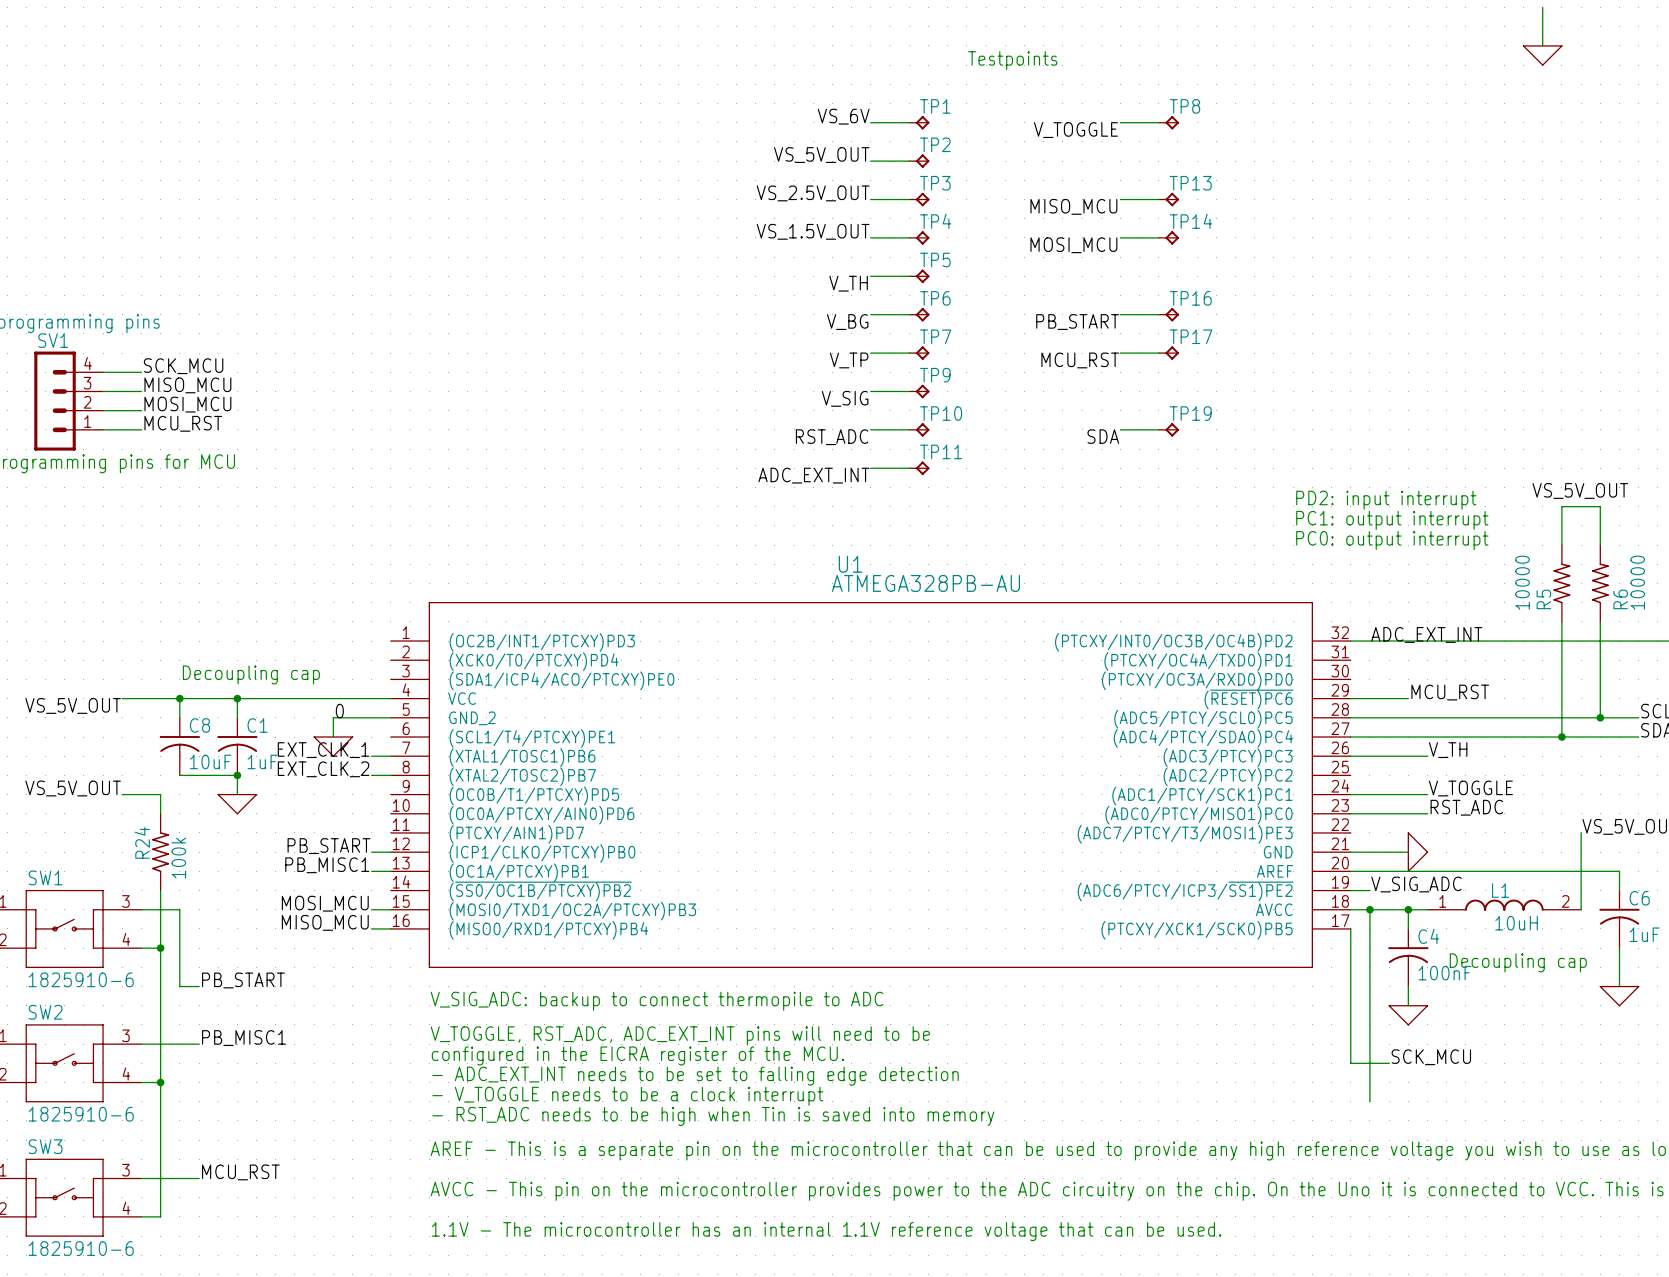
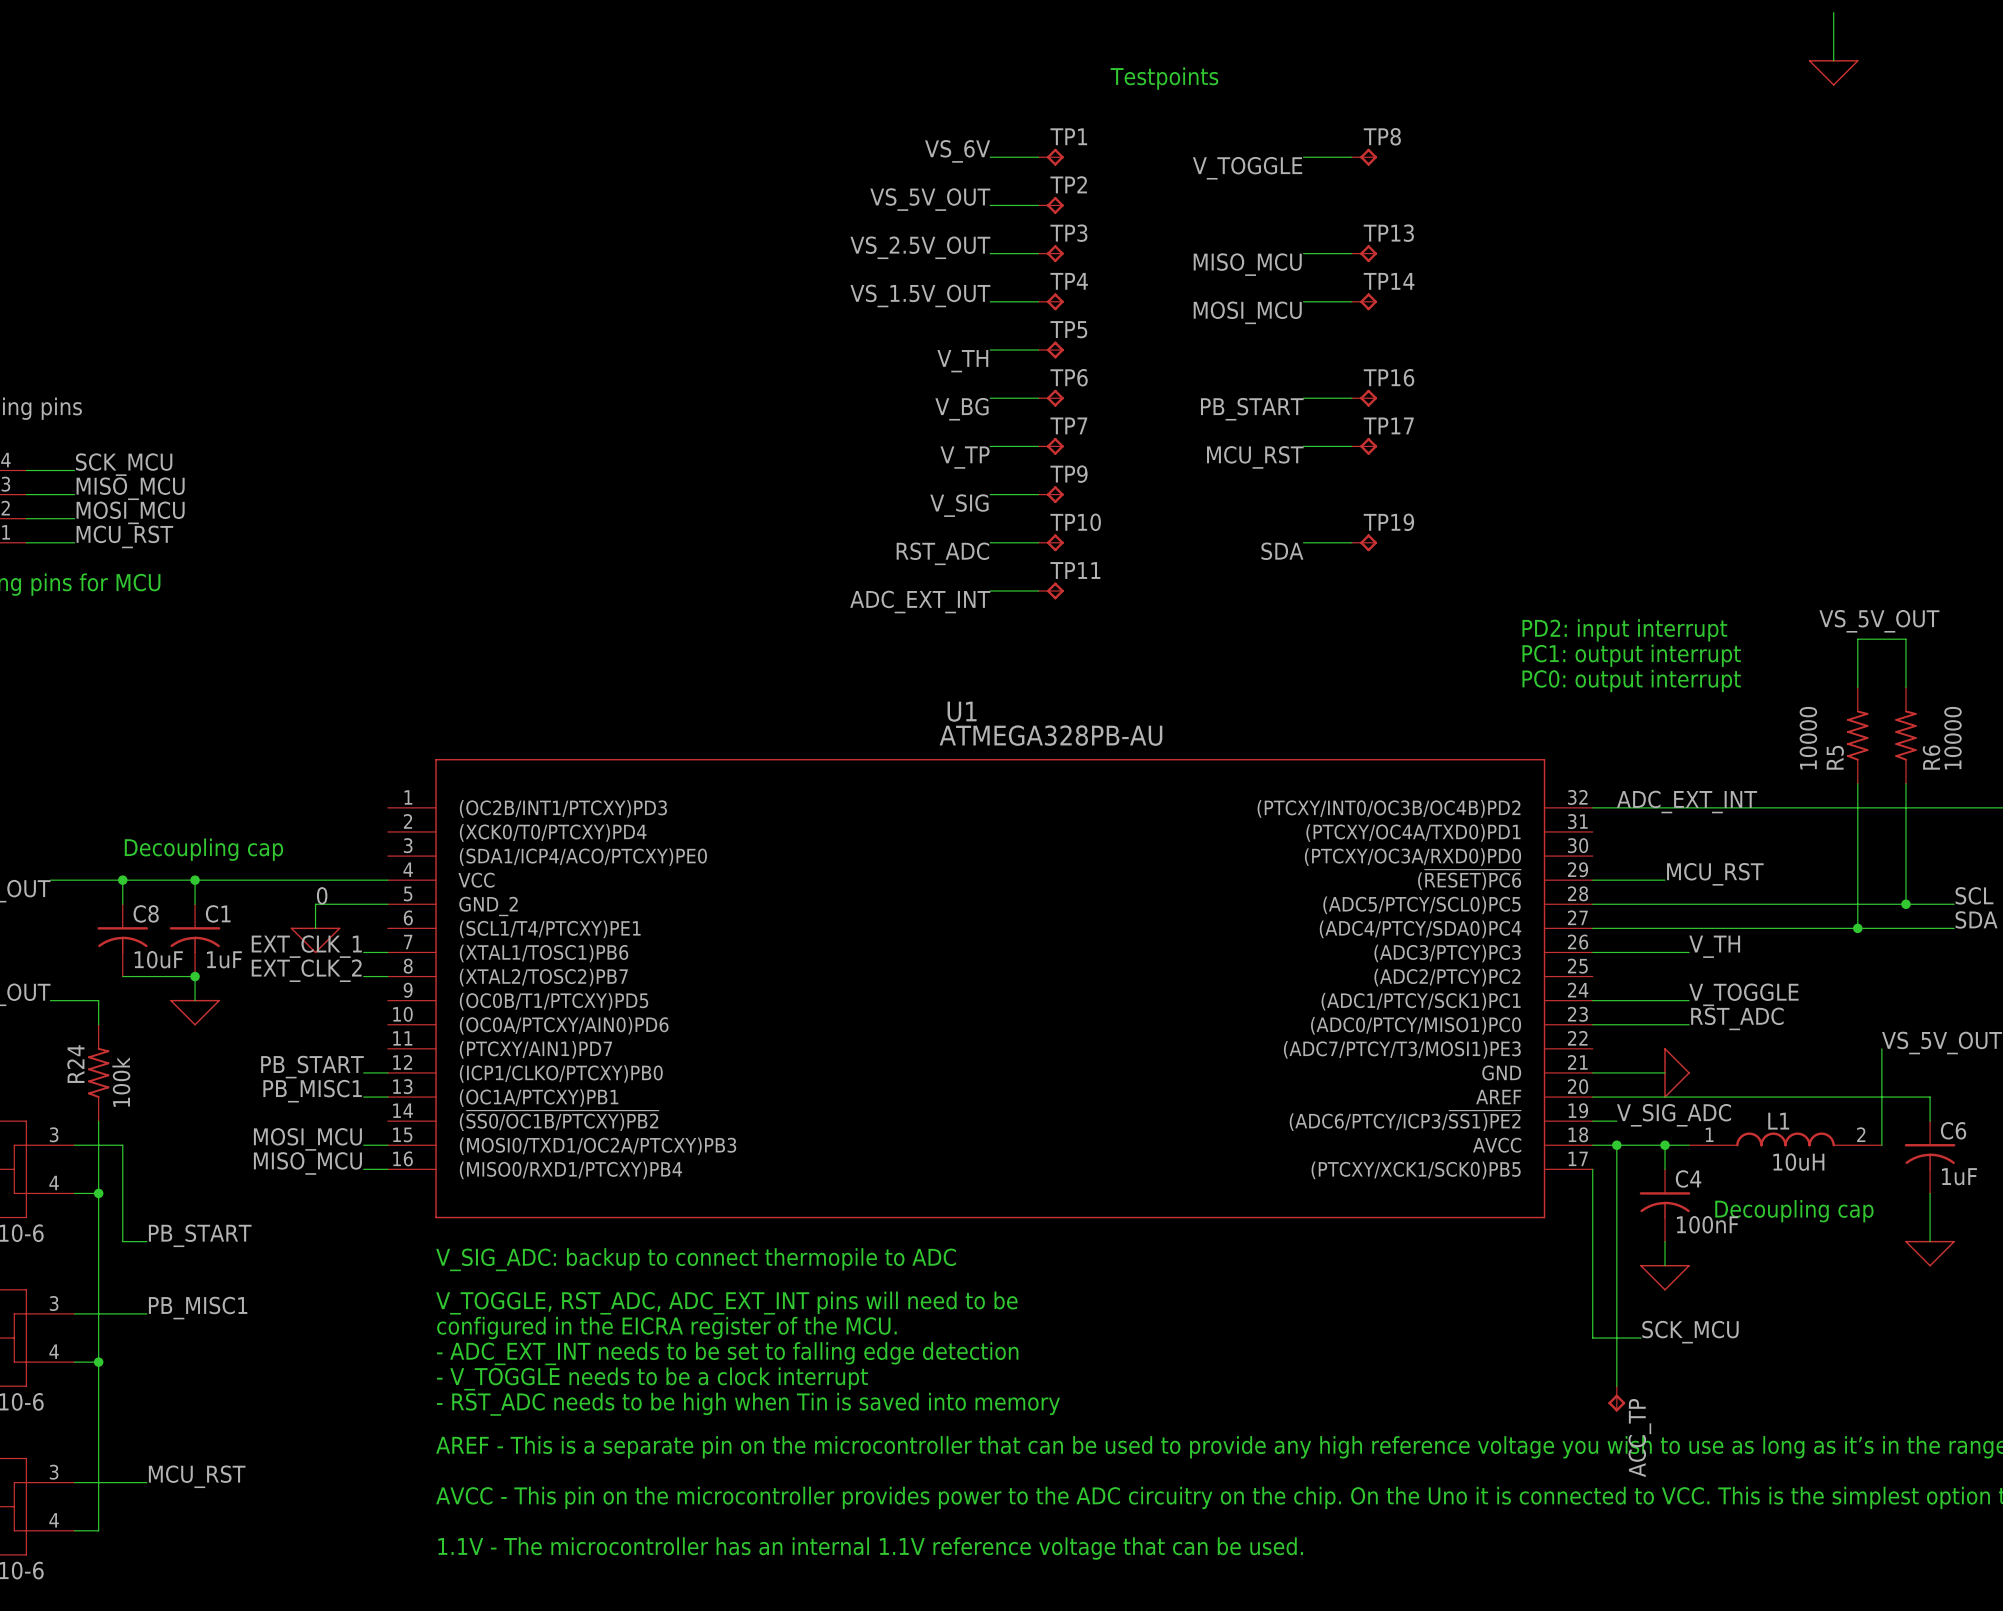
ACC_TP: none -> (1616, 1398)

